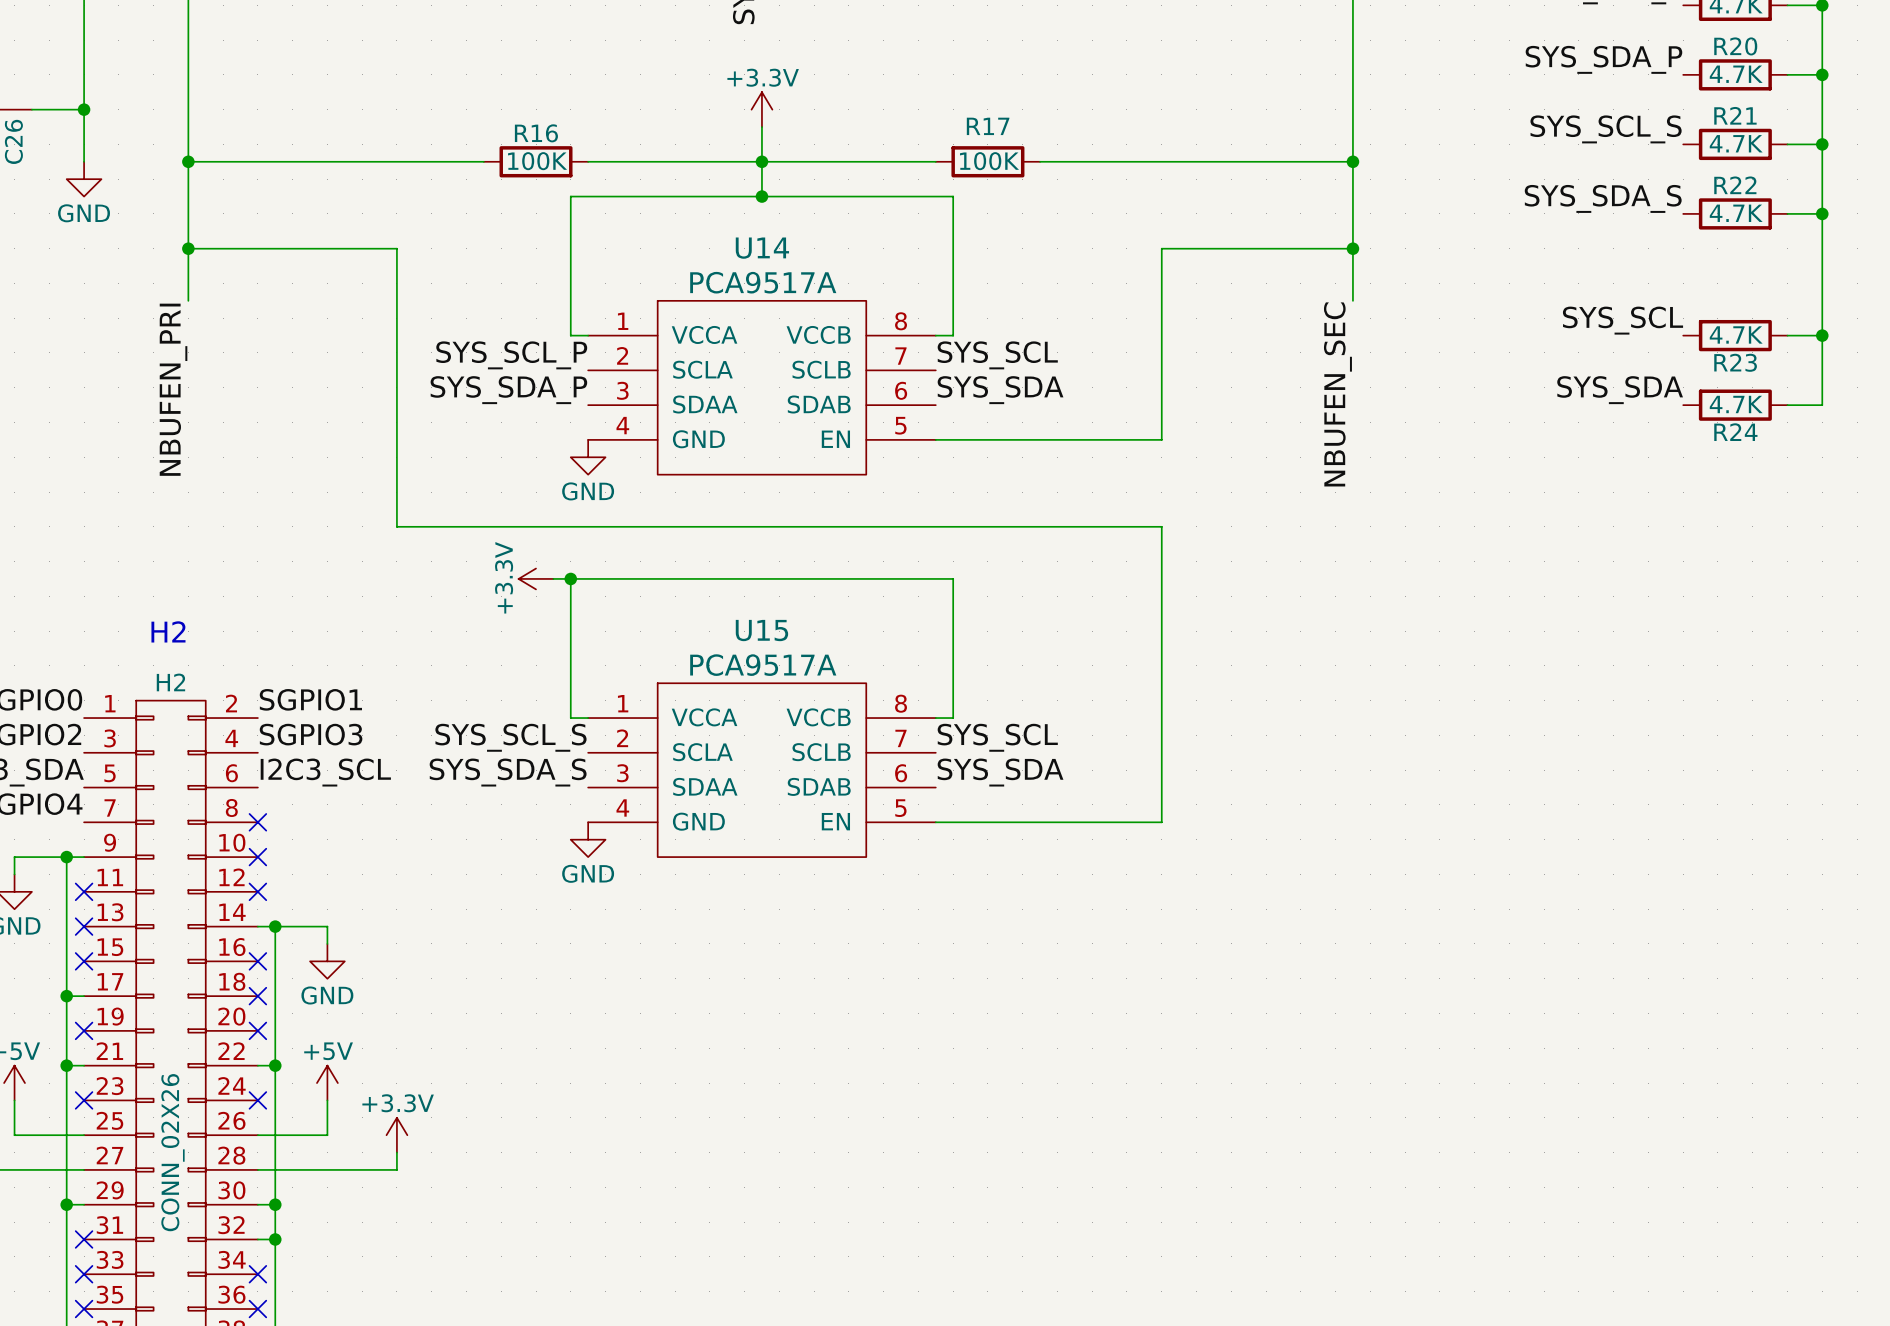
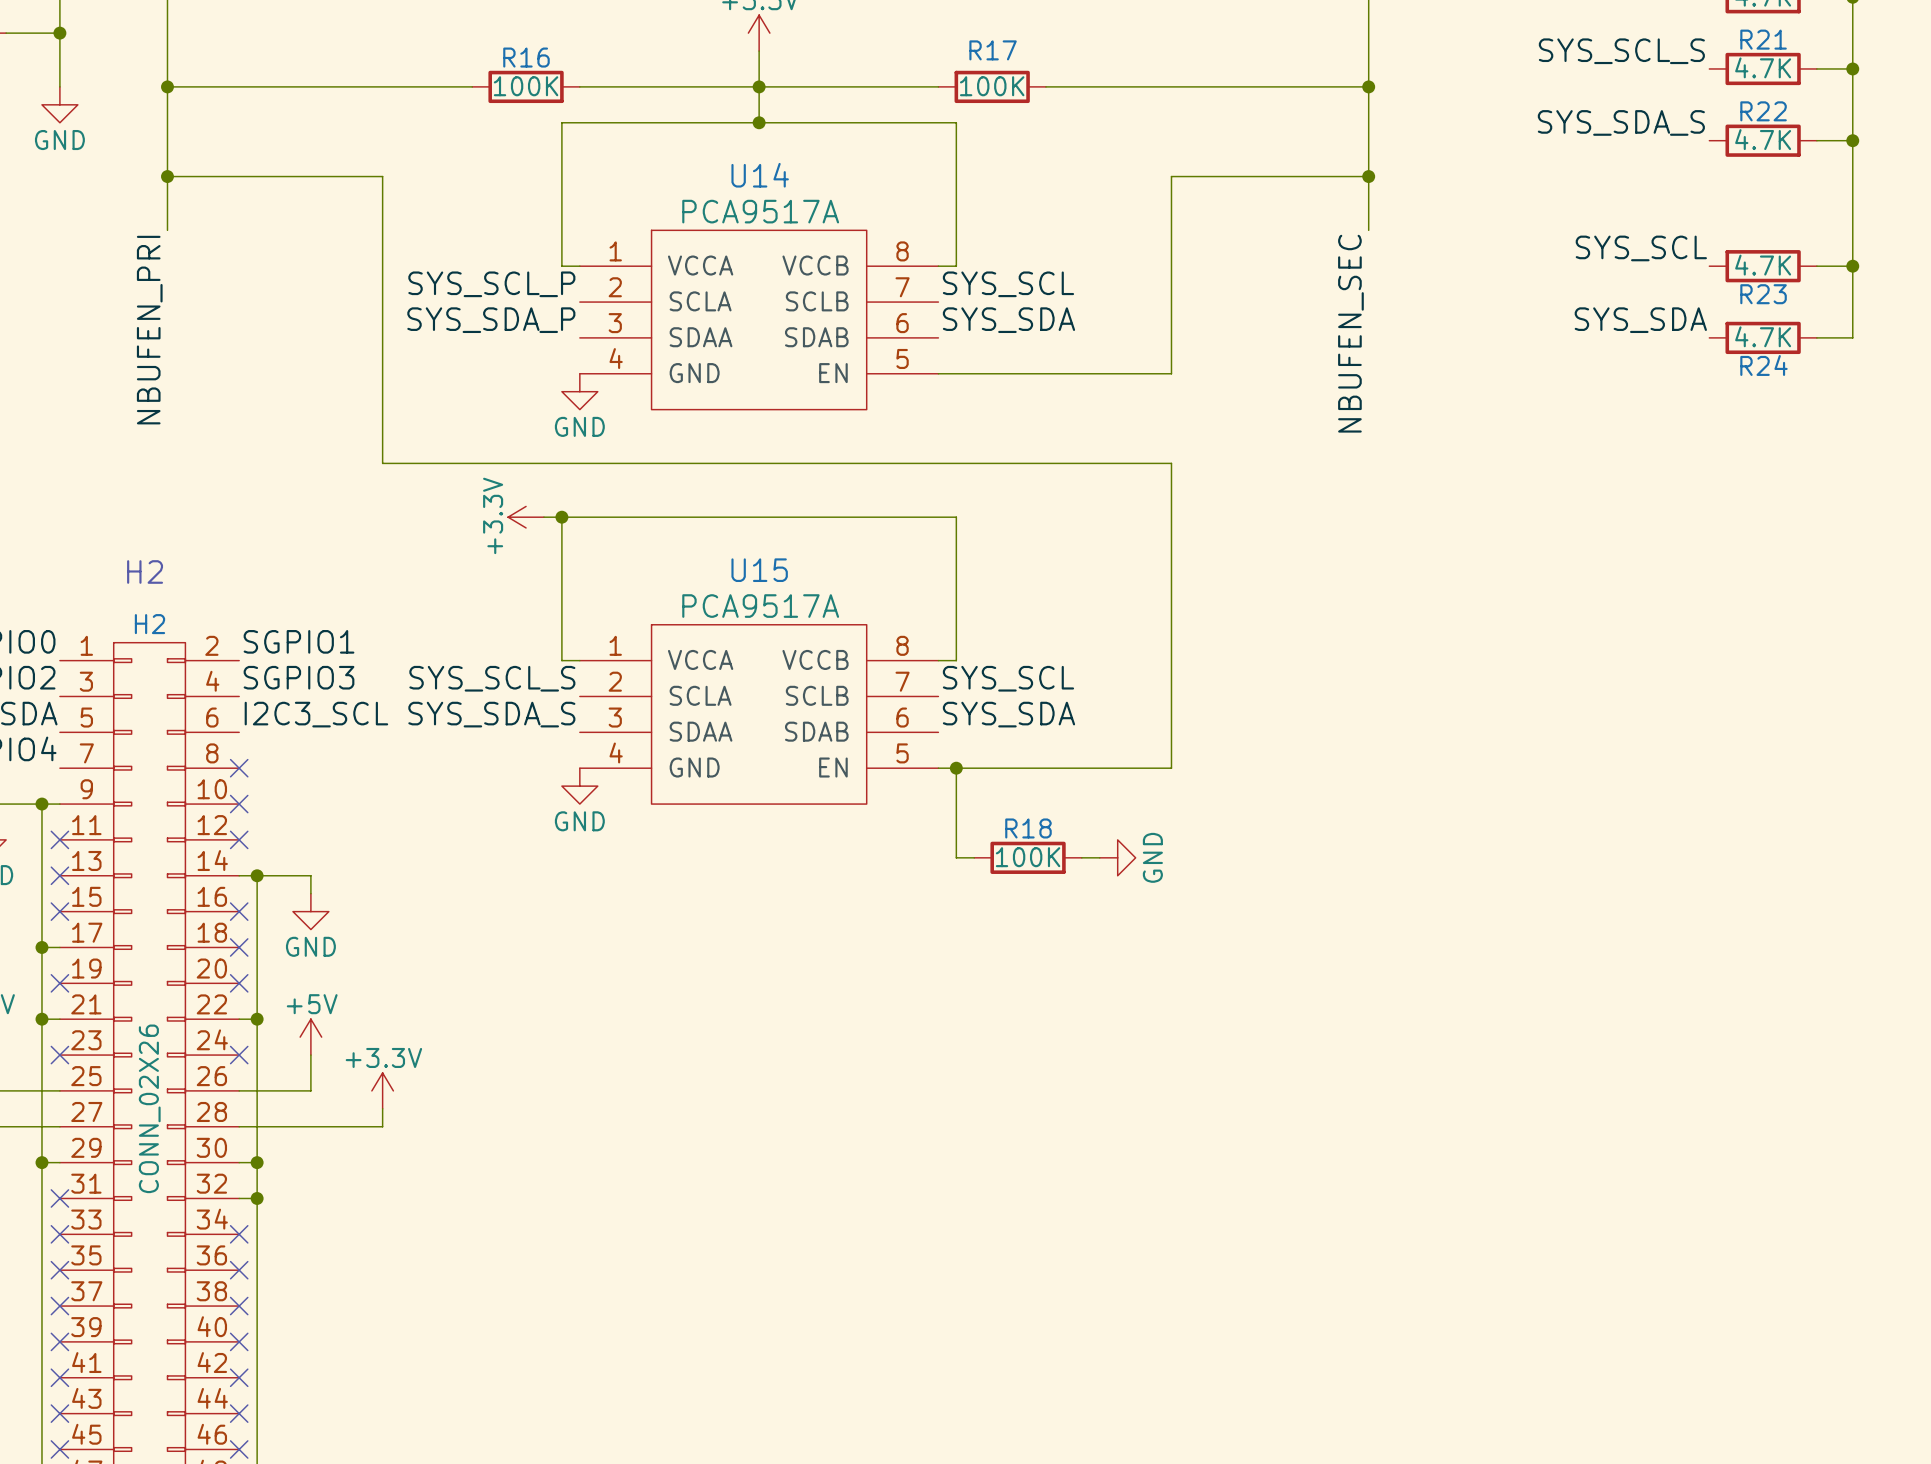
wire: none -> (956, 768) (956, 857) (974, 857)
junction: none -> (956, 768)
R18: none -> 100K (1028, 857)
wire: none -> (1081, 857) (1099, 857)
power symbol: none -> GND (1117, 857)

